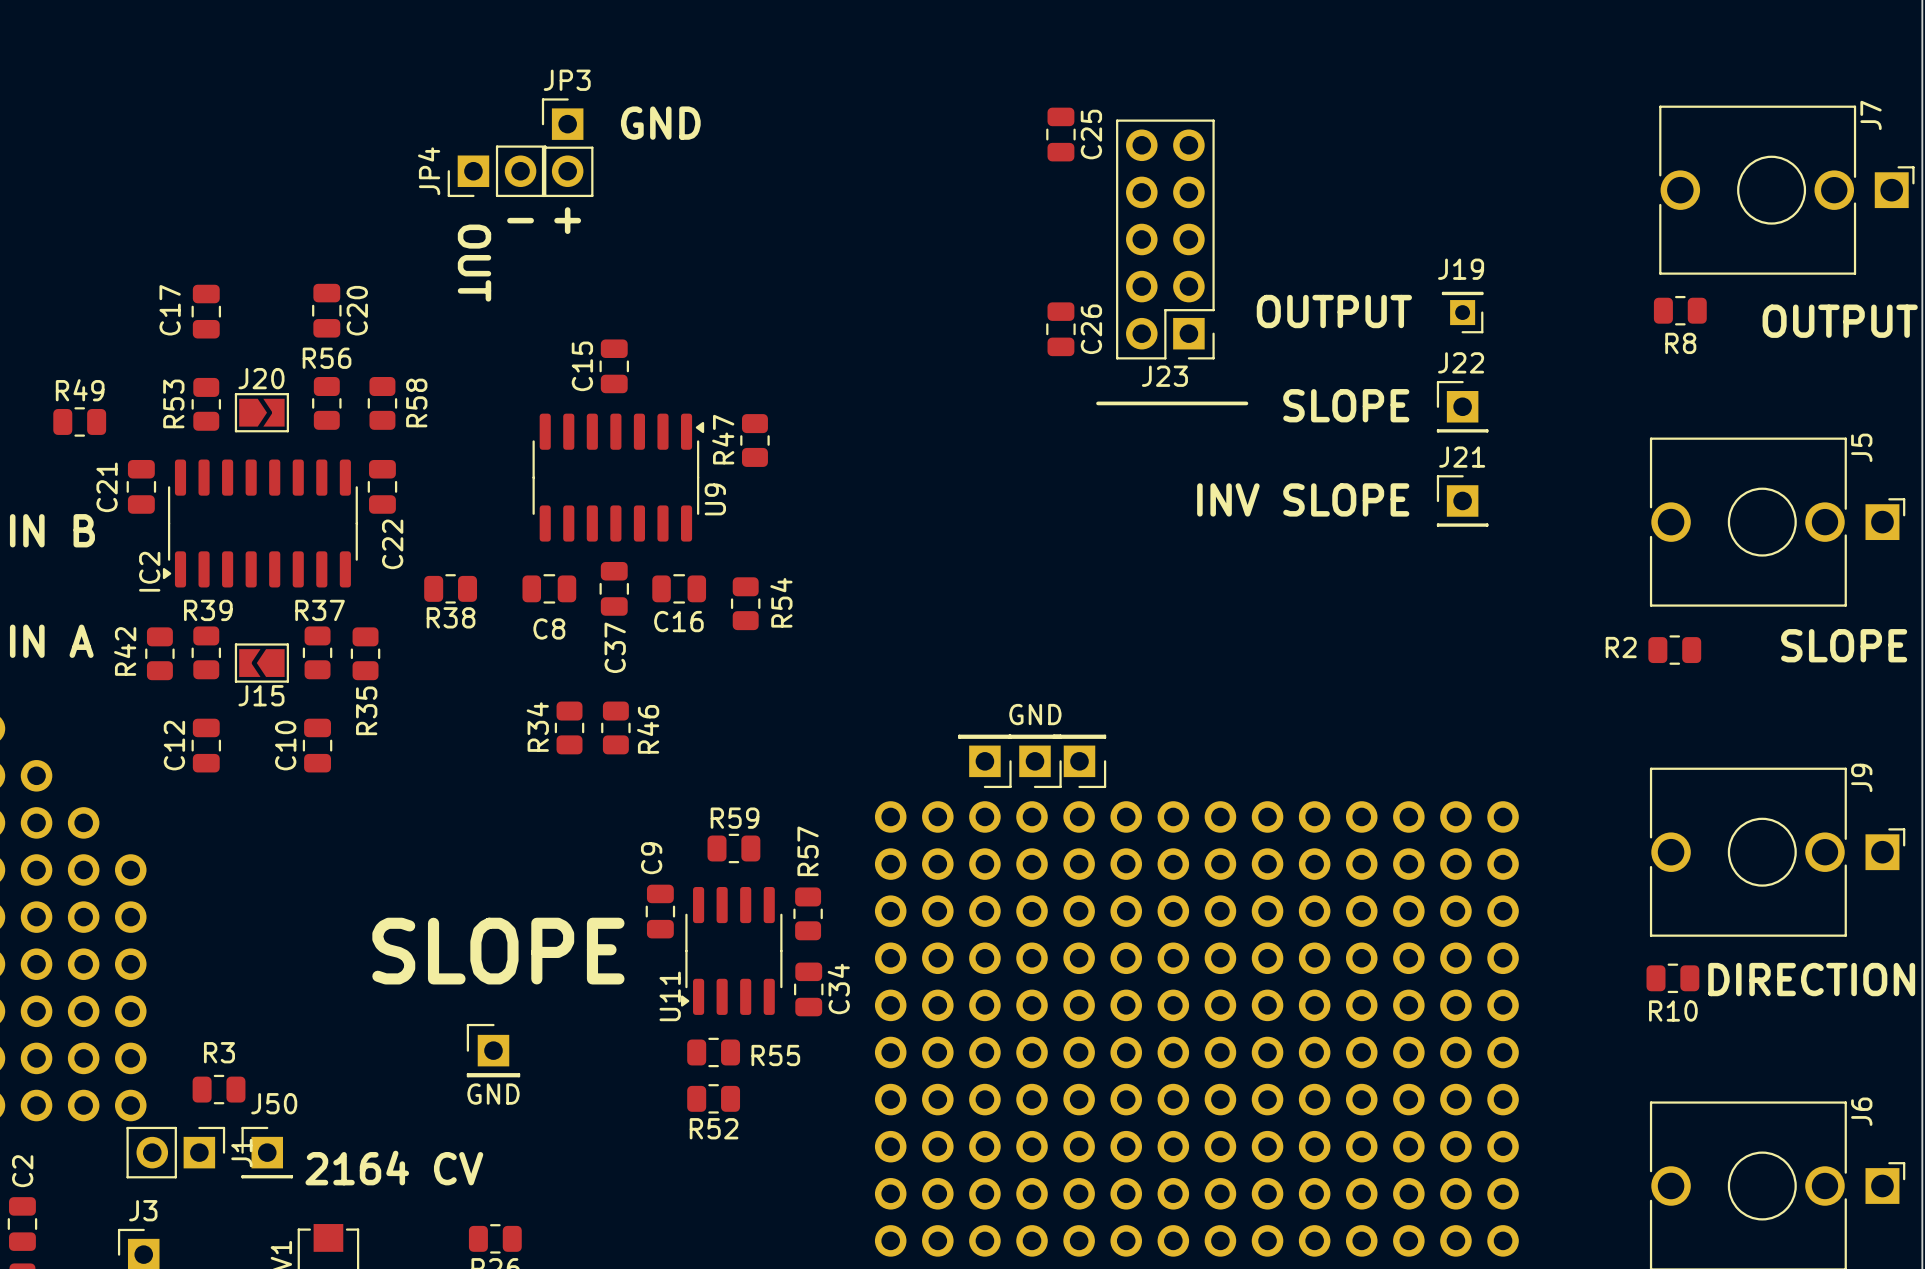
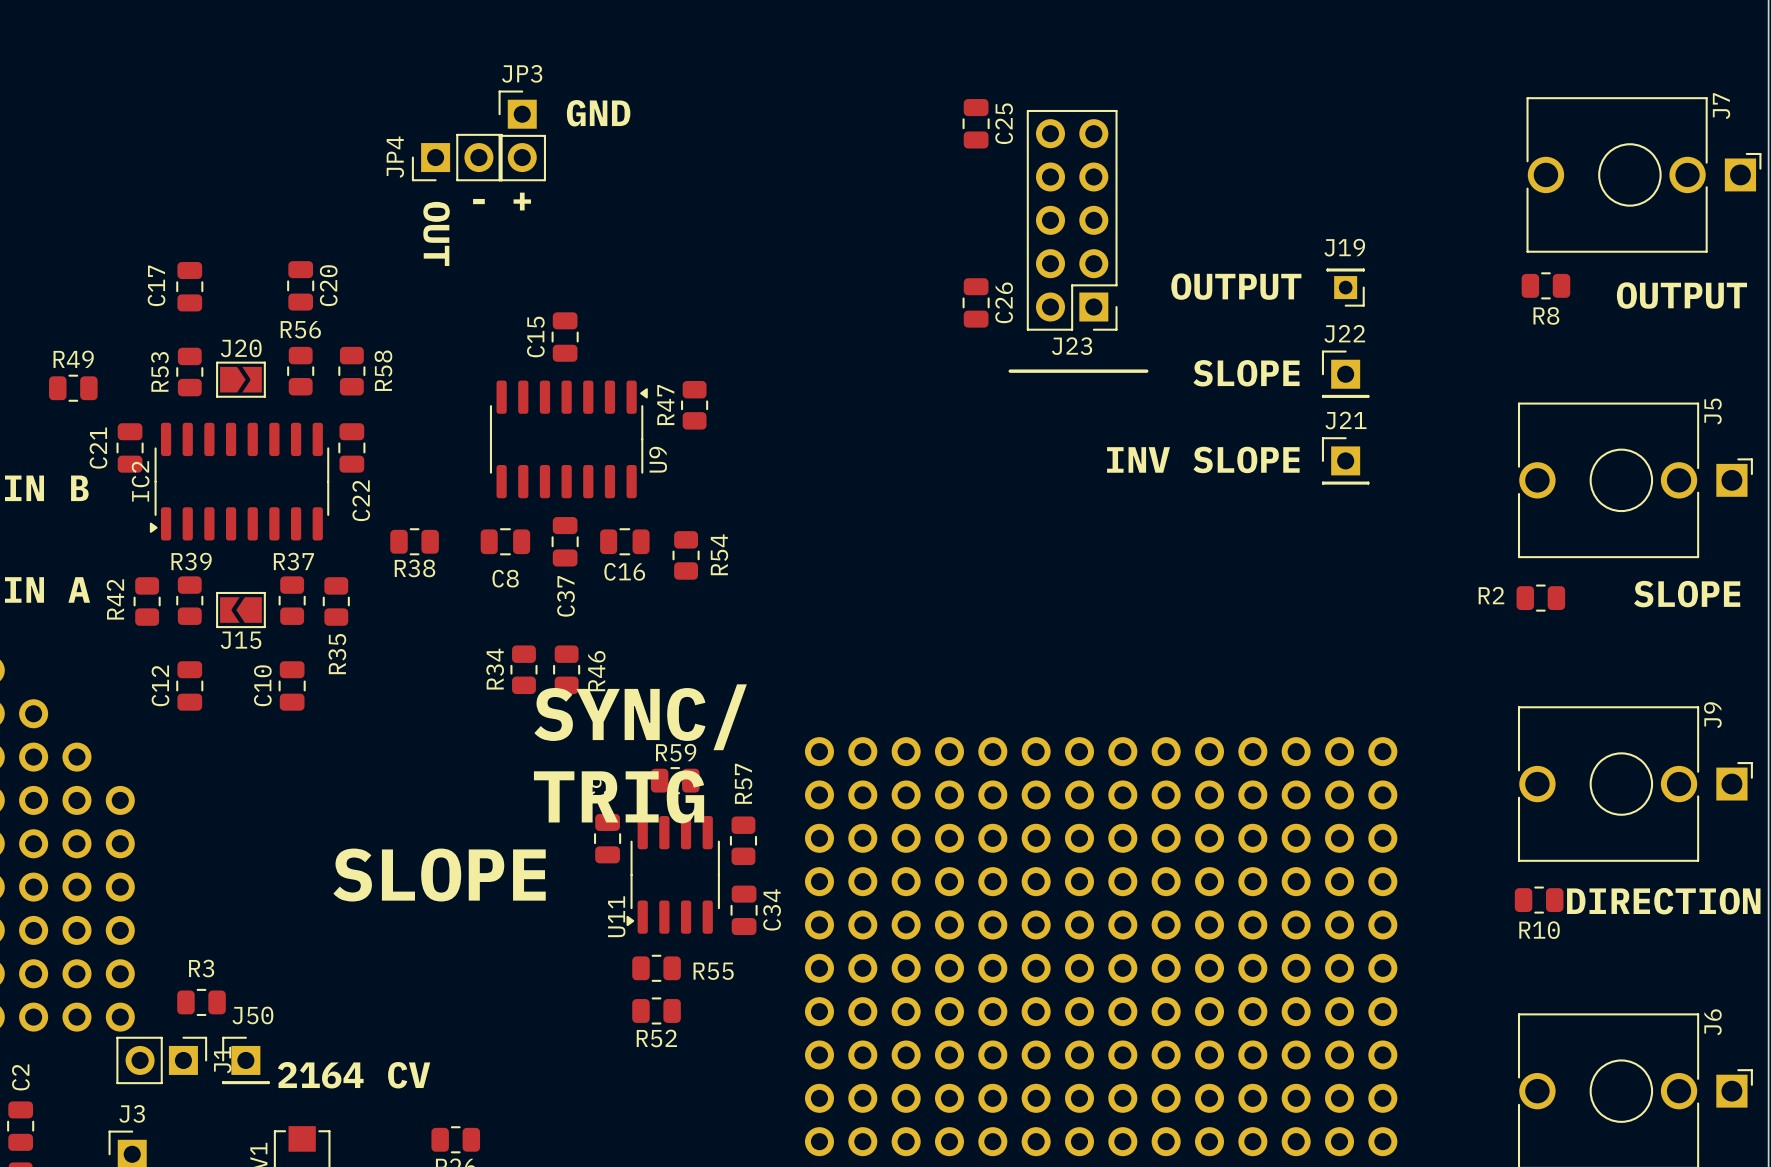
IC2 name position: IC2 (149, 571) -> IC2 (140, 481)
text: GND (1035, 714) -> none
part: (984, 761) -> none
part: (1034, 761) -> none
part: (1079, 761) -> none
text: none -> SYNC/ (640, 717)
text: none -> TRIG (619, 796)
part: GND (493, 1050) -> none

